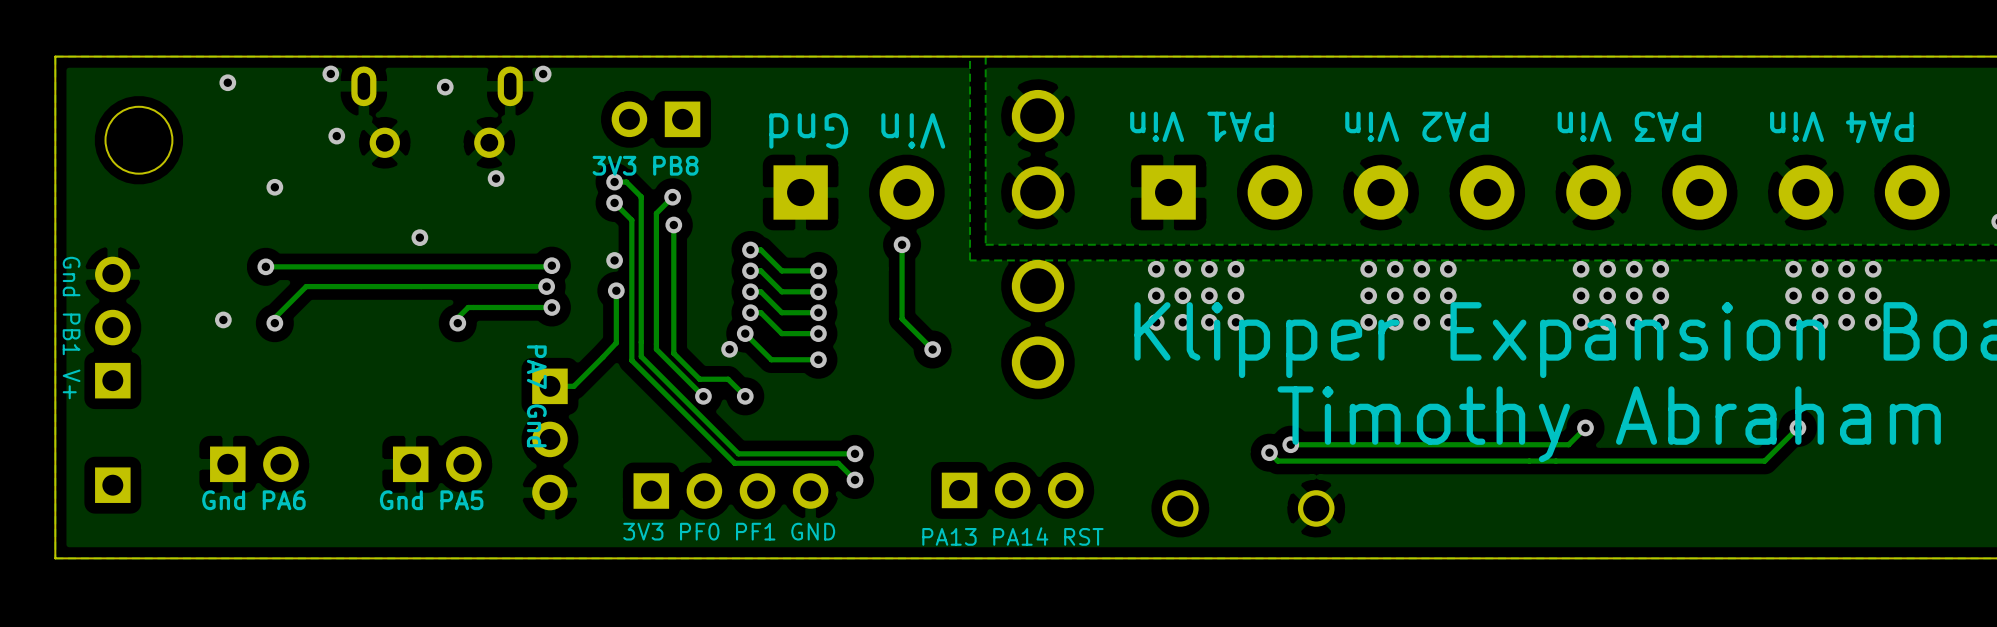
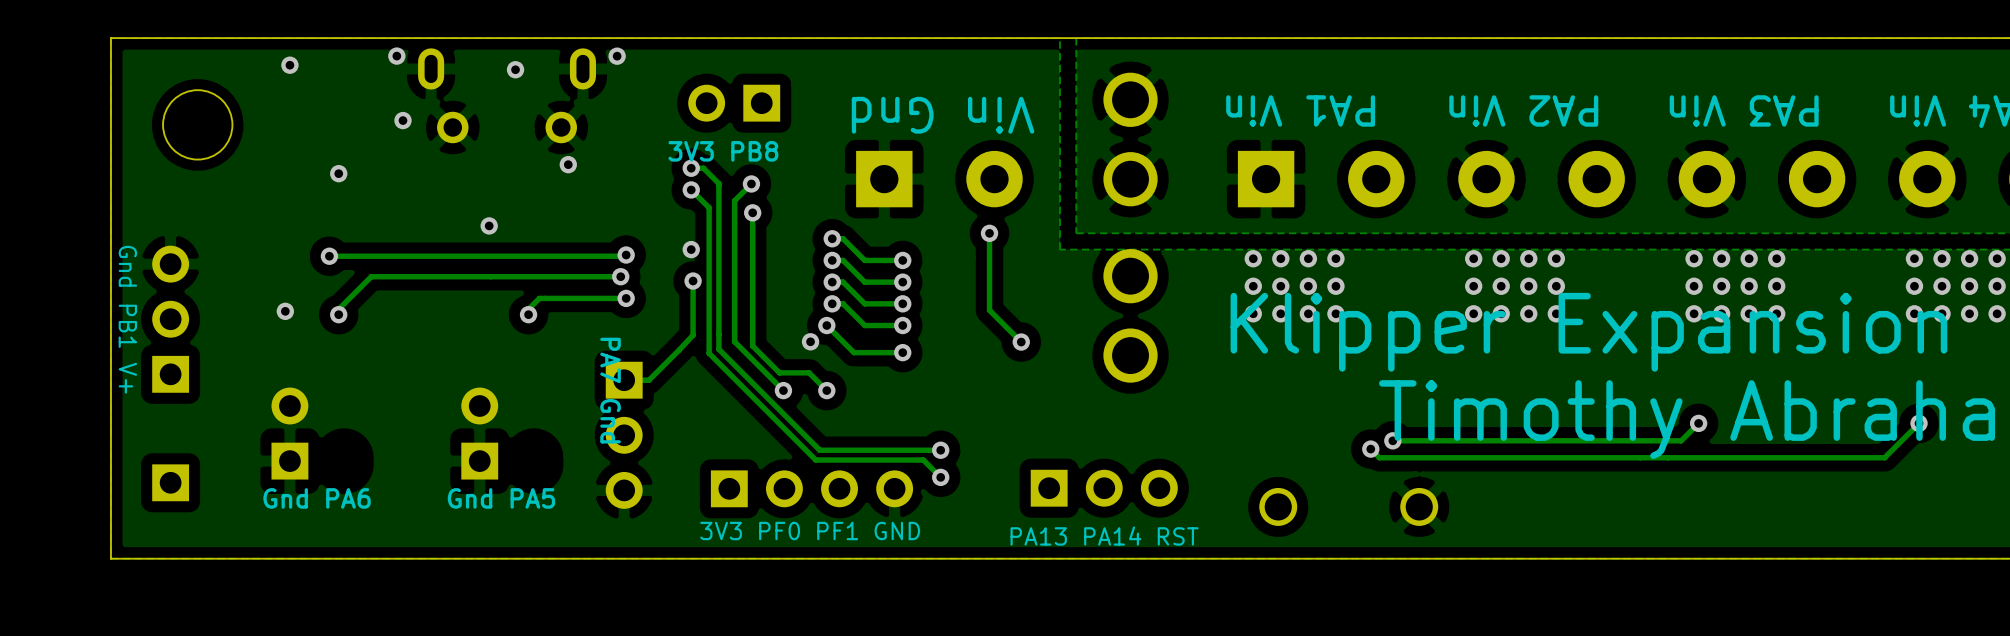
part rotation: 0° (254, 464) -> 90° counterclockwise (289, 433)
part rotation: 0° (437, 464) -> 90° counterclockwise (479, 433)

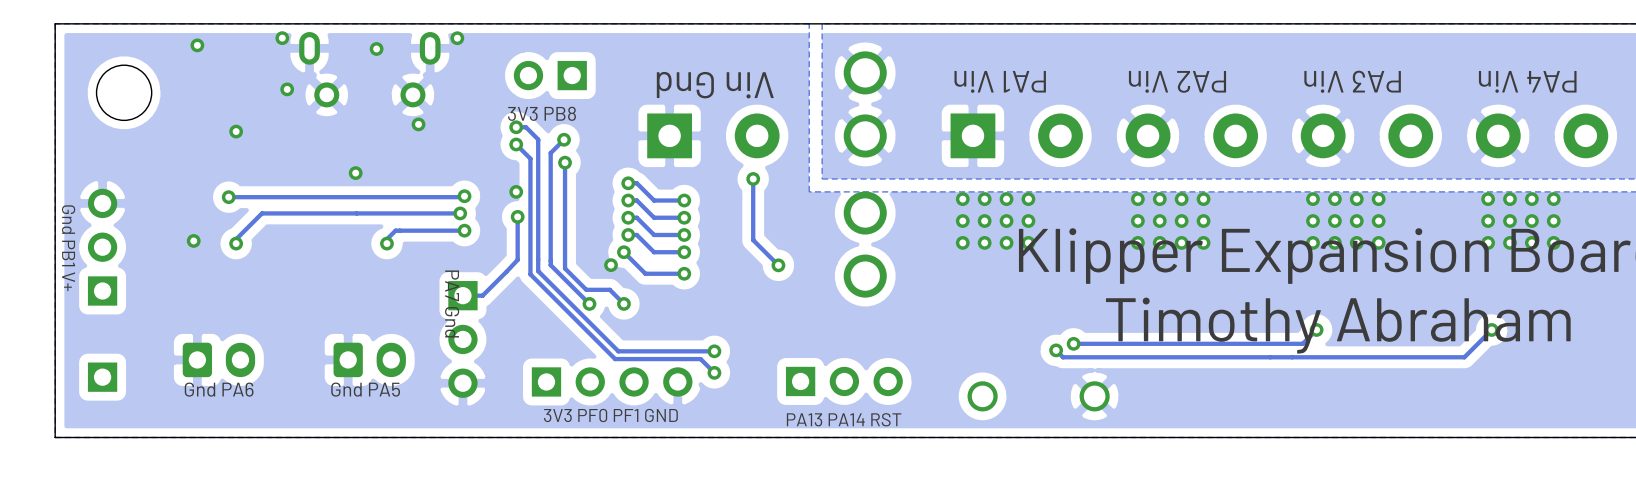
part: (289, 433) -> none
part: (479, 433) -> none
part: none -> (218, 359)
part: none -> (369, 359)

